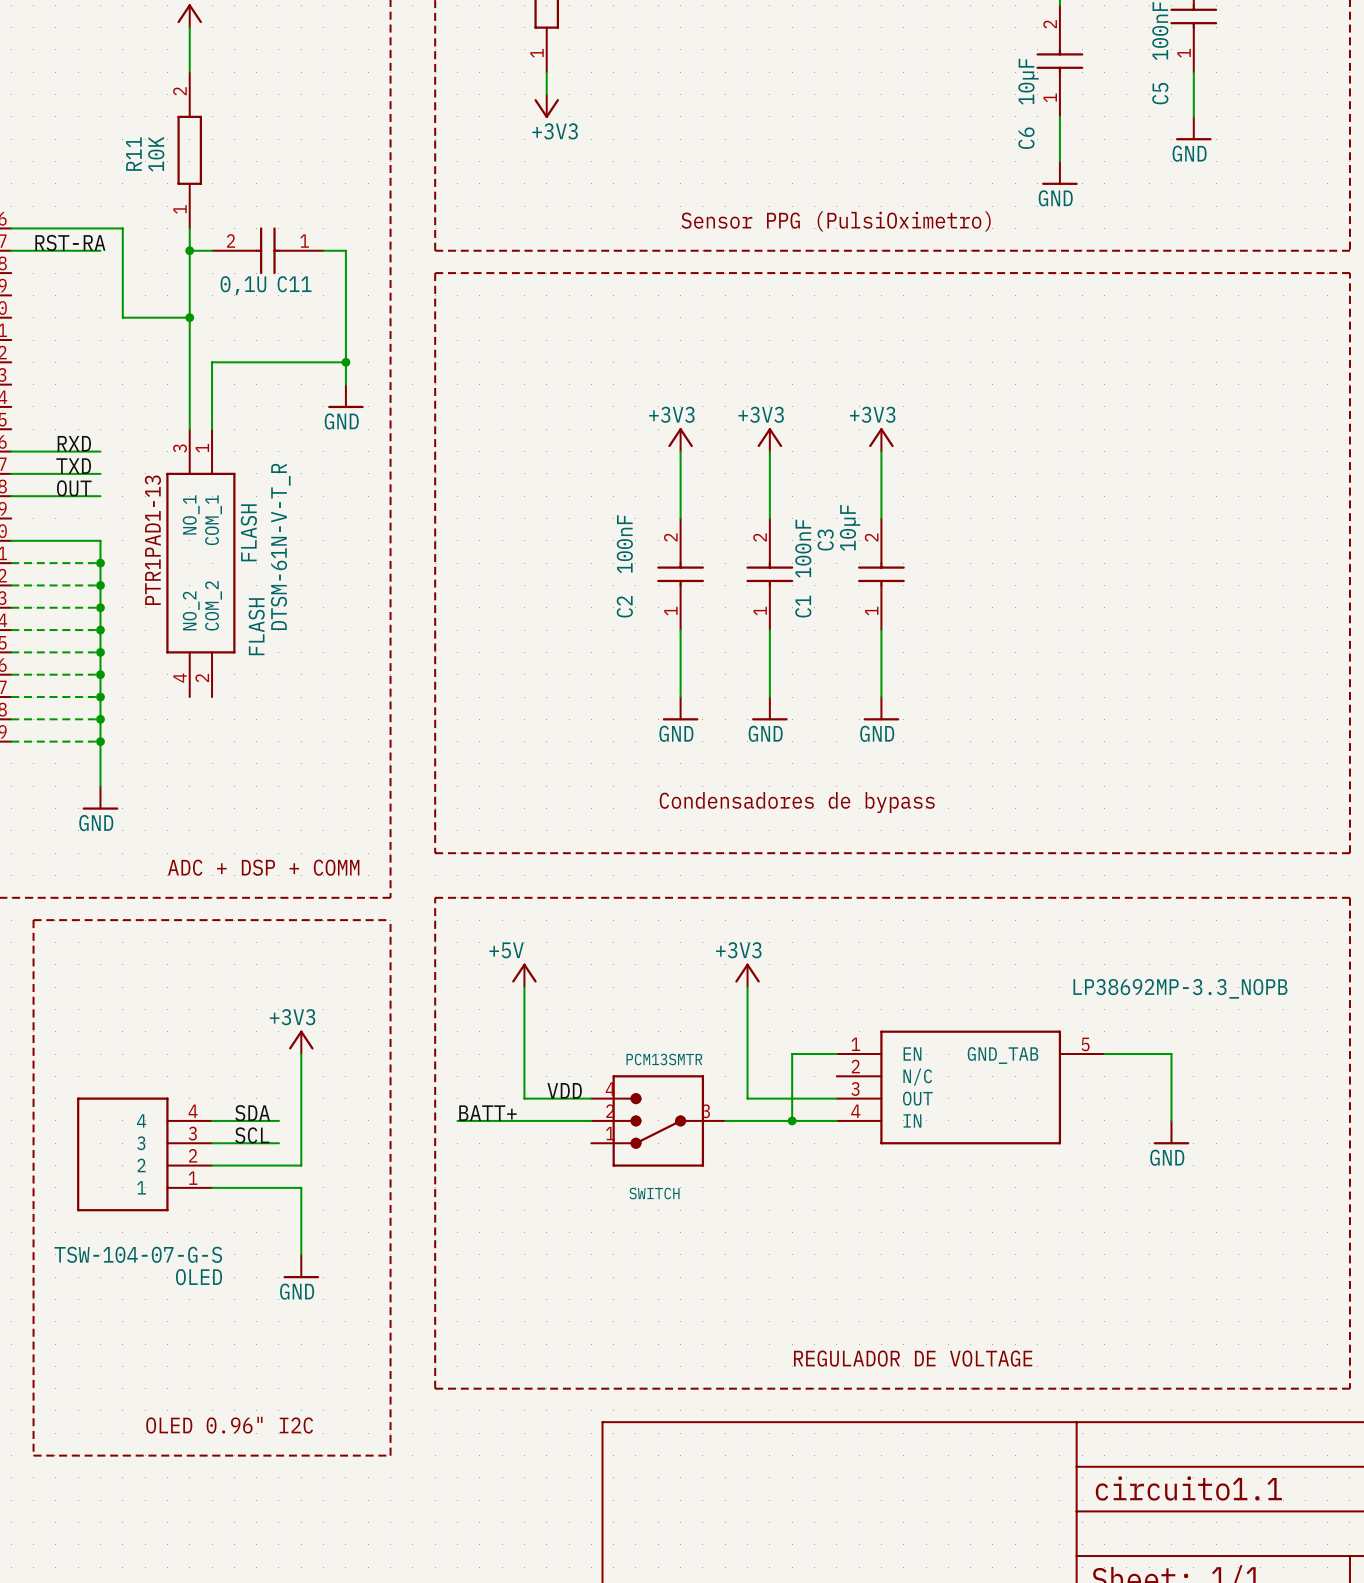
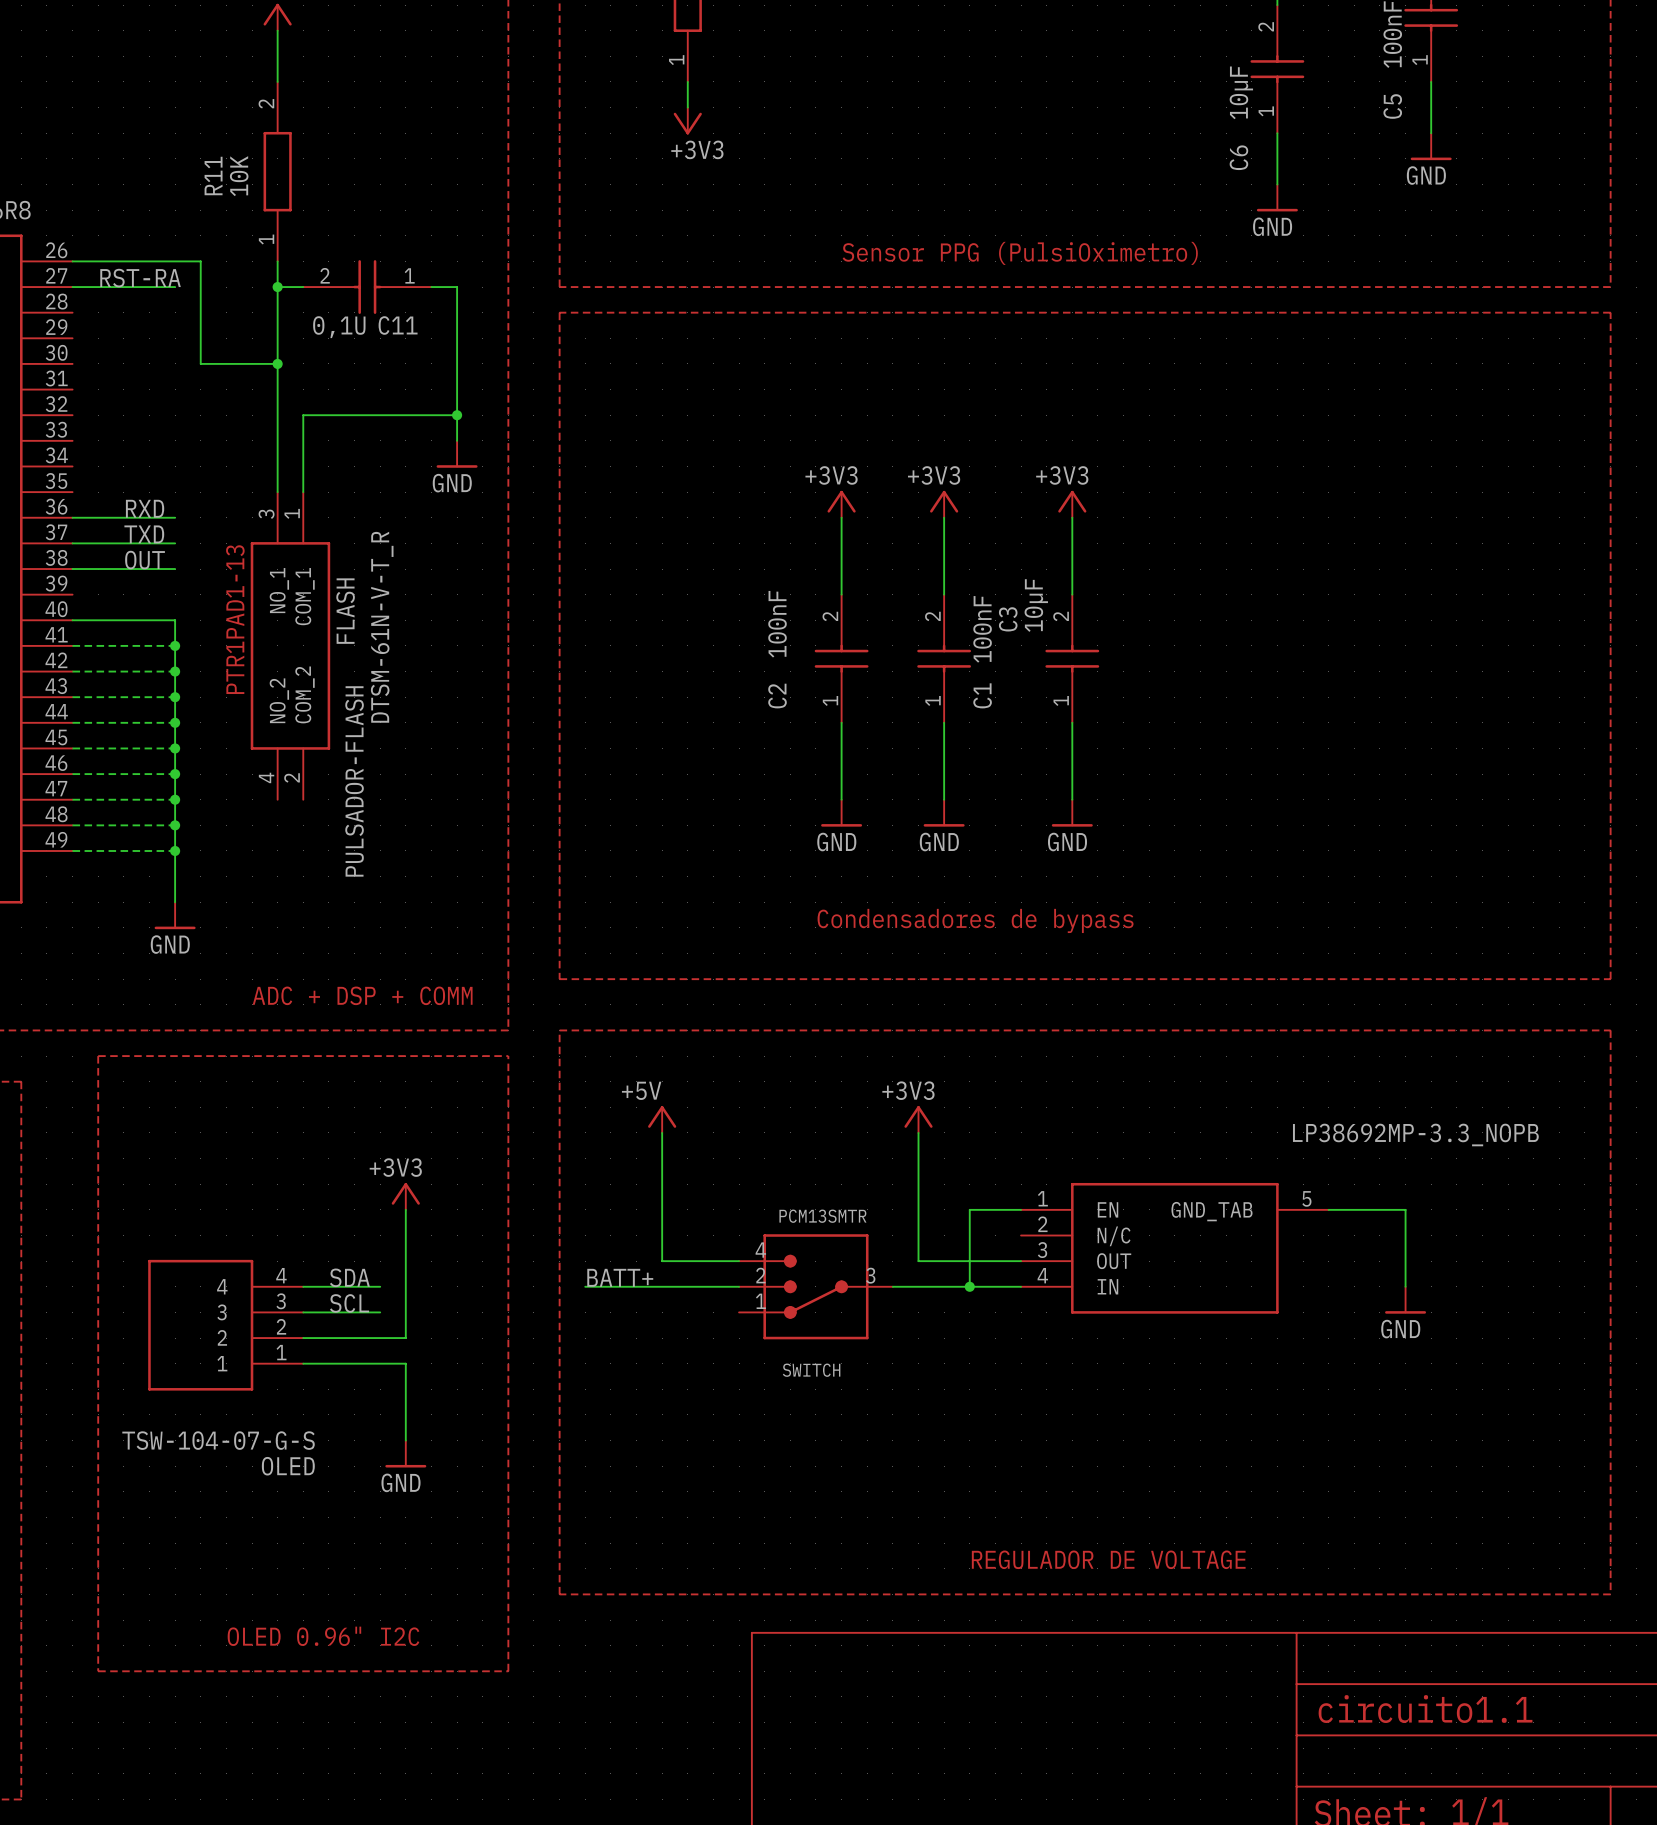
FLASH name: FLASH (256, 626) -> PULSADOR-FLASH (354, 781)
label: VDD (564, 1090) -> none

